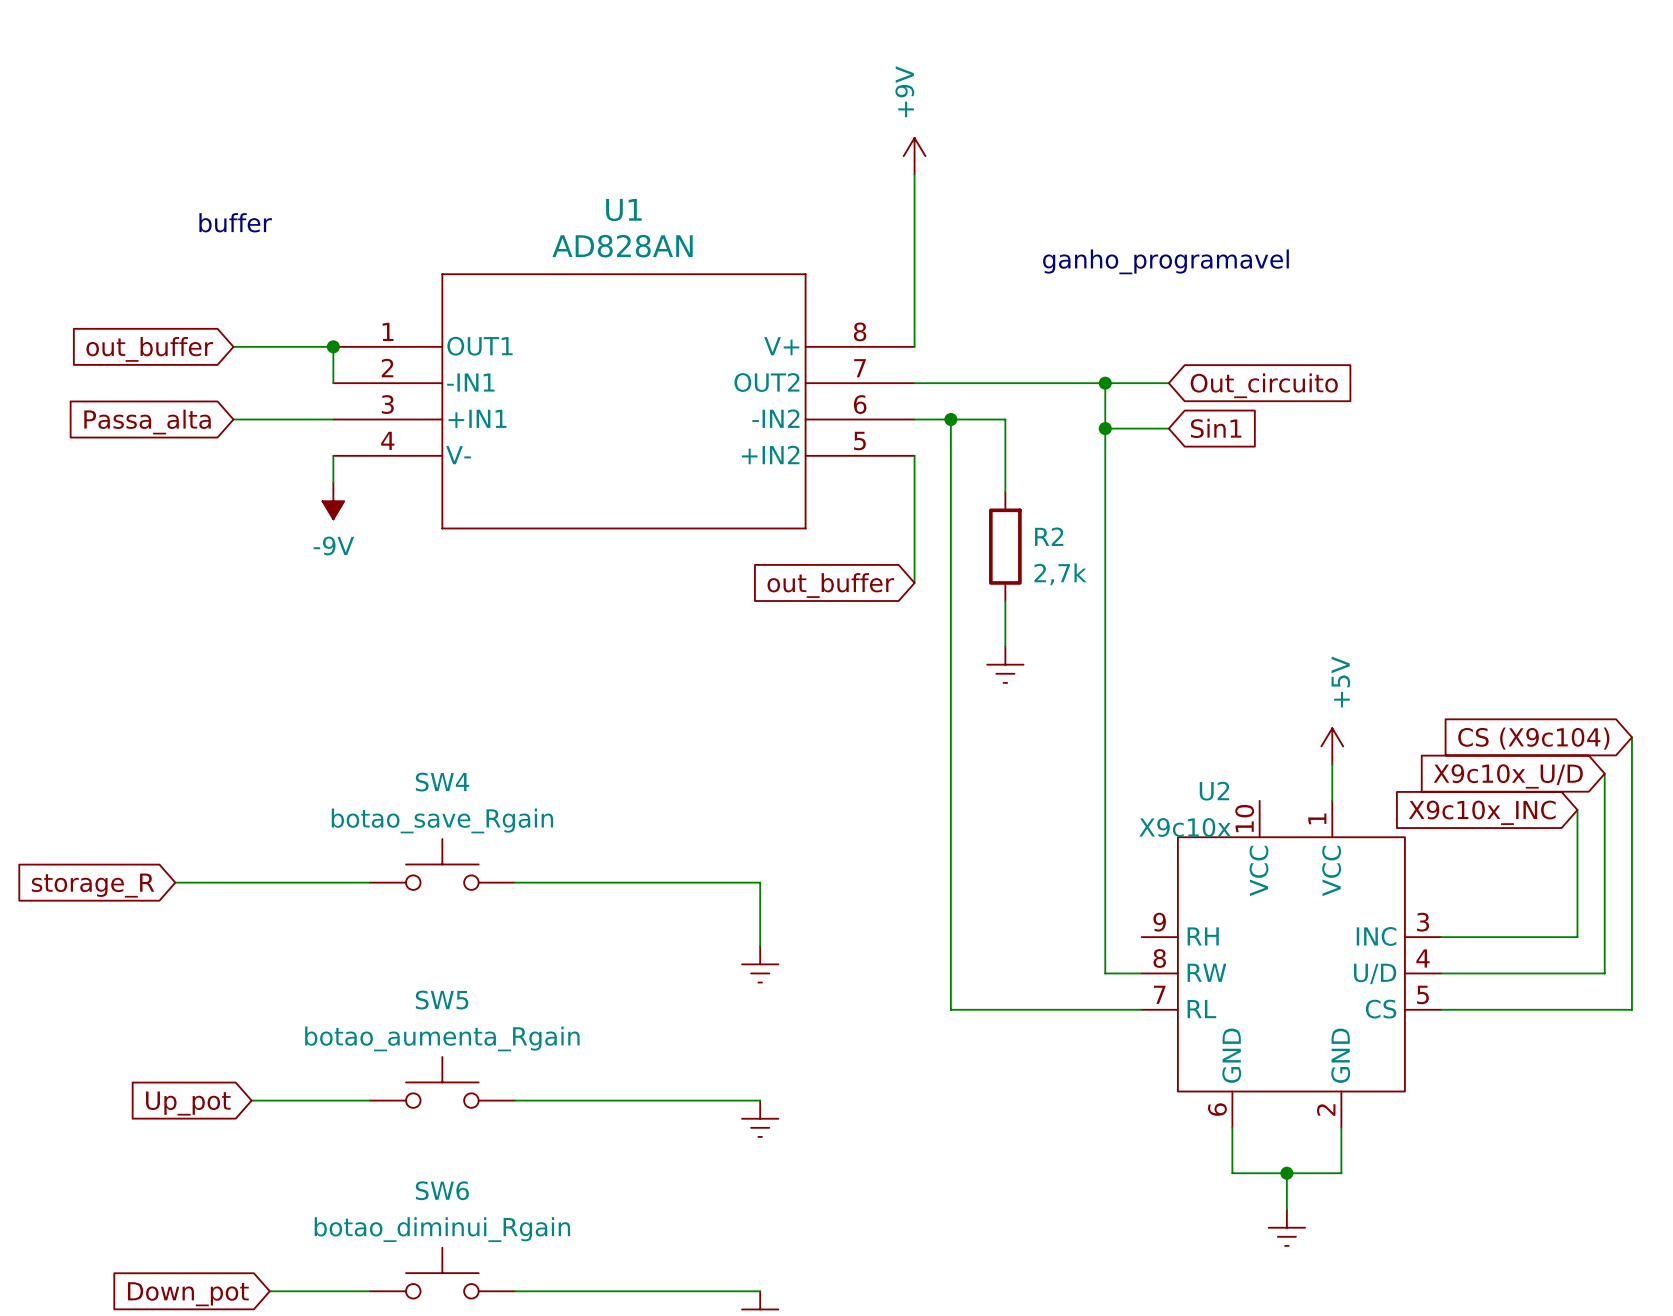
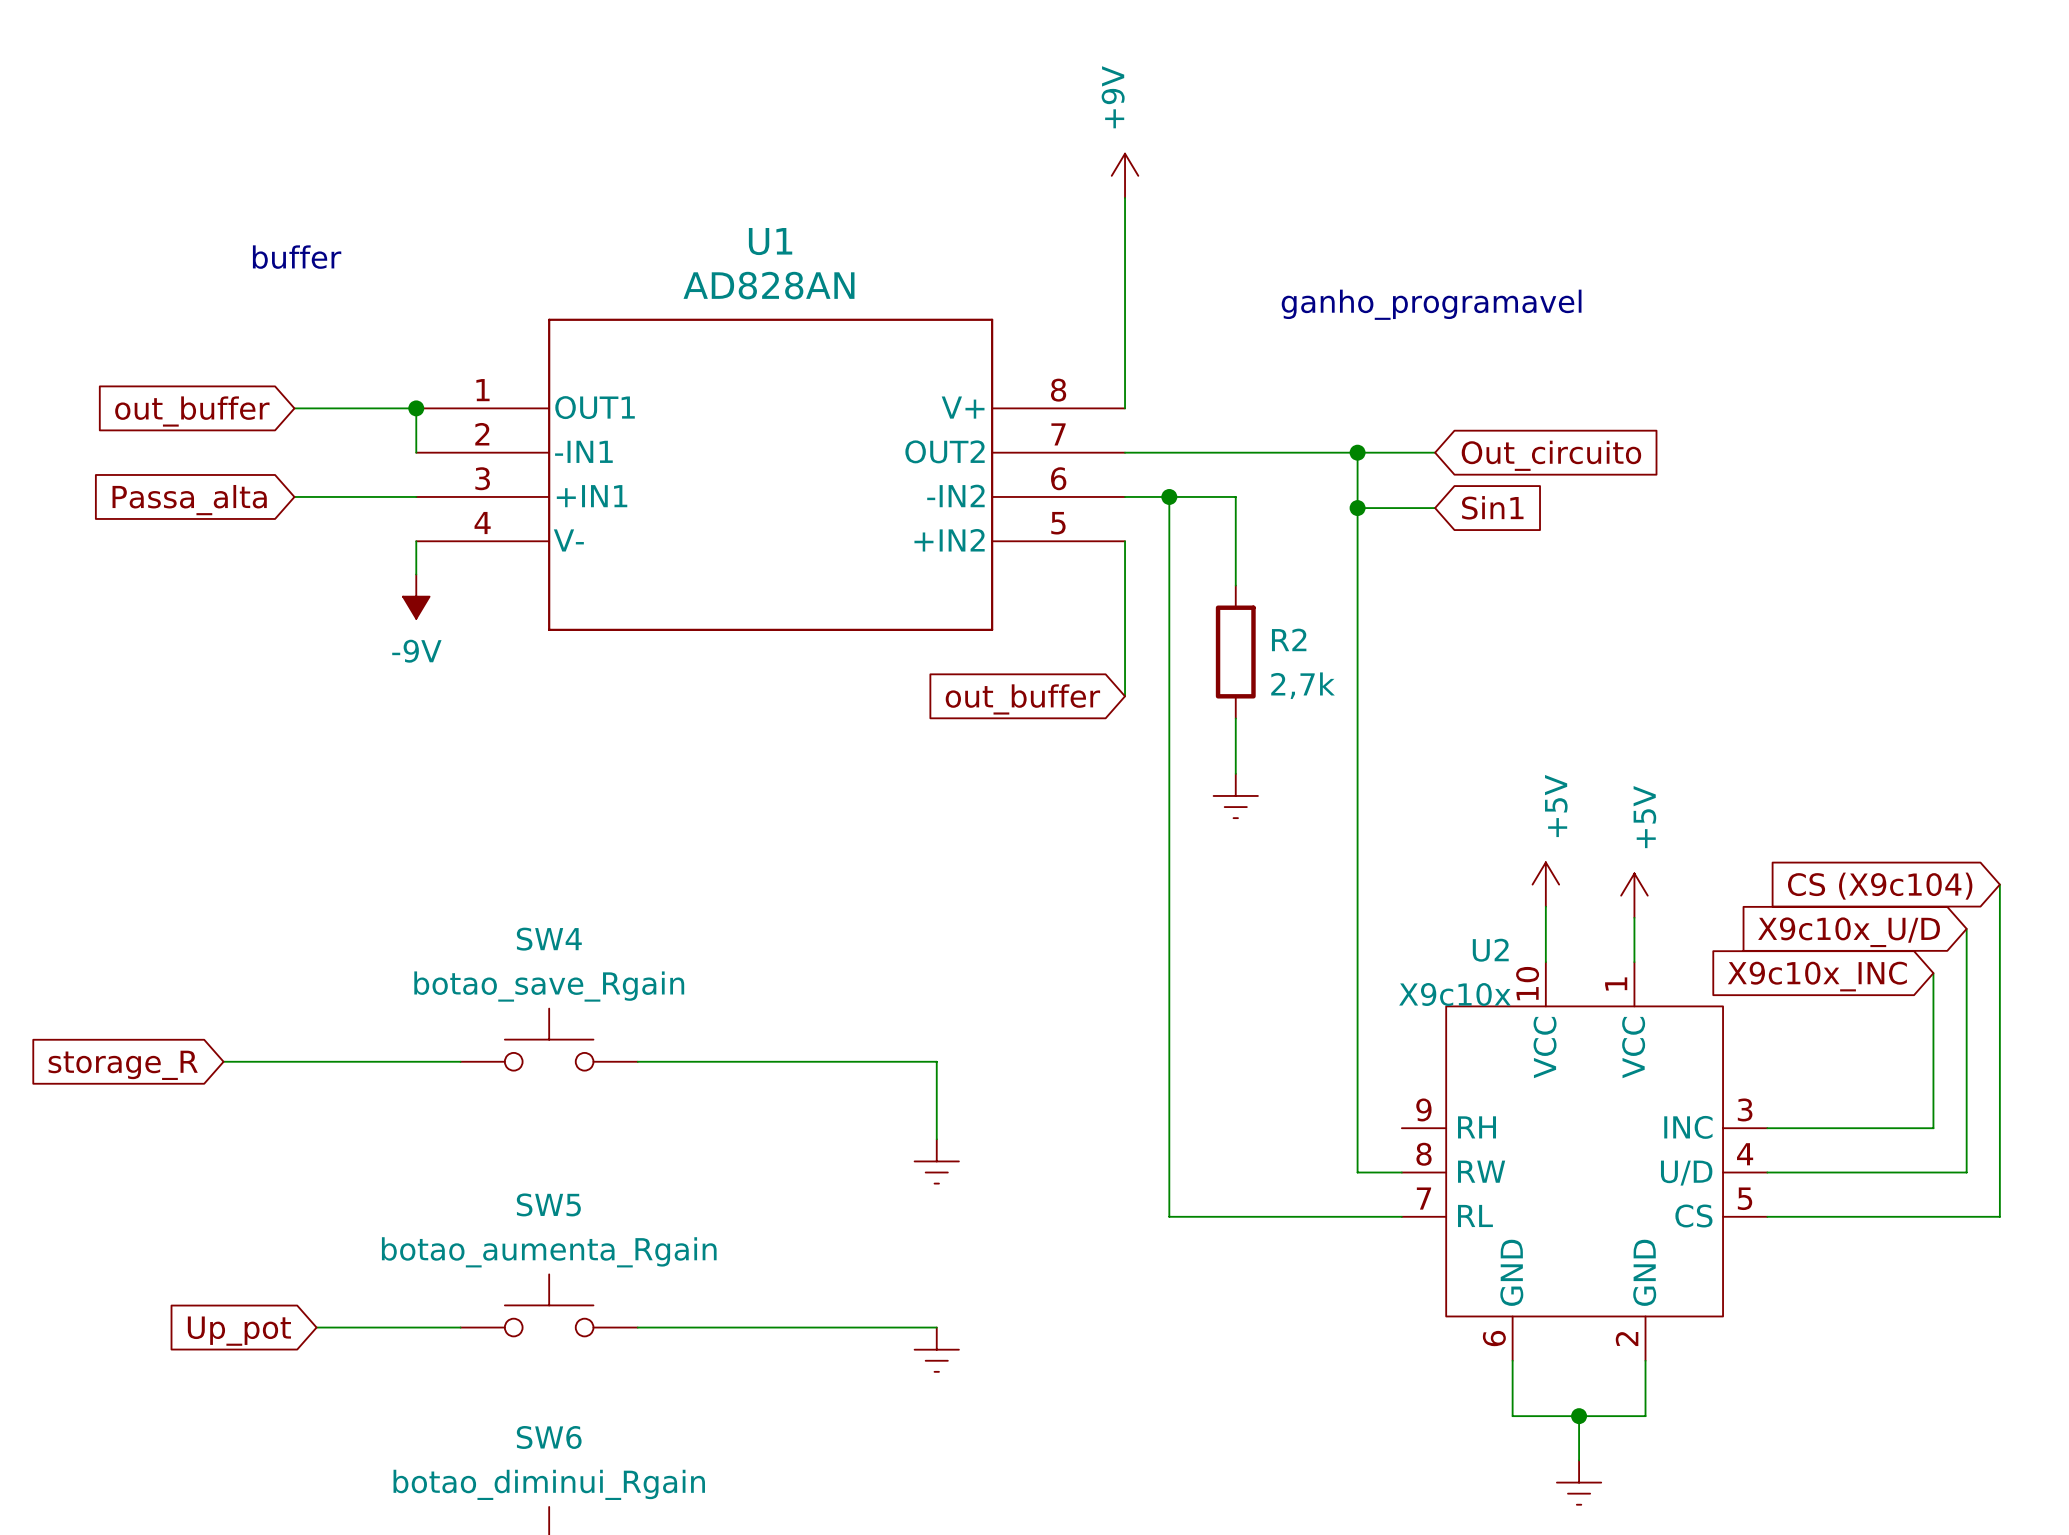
power symbol: none -> +5V (1545, 884)
wire: none -> (1545, 906) (1545, 962)

